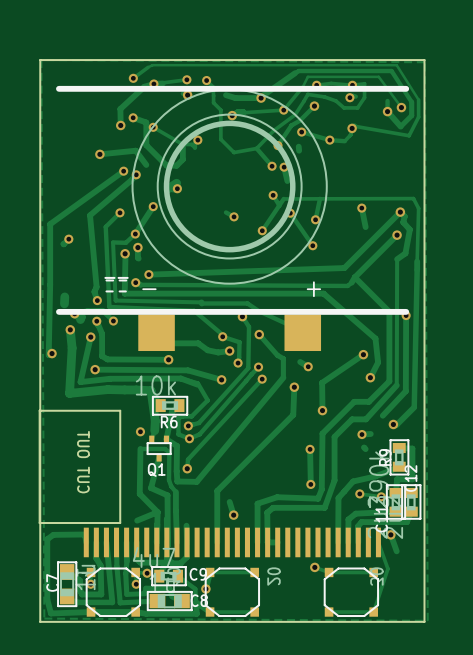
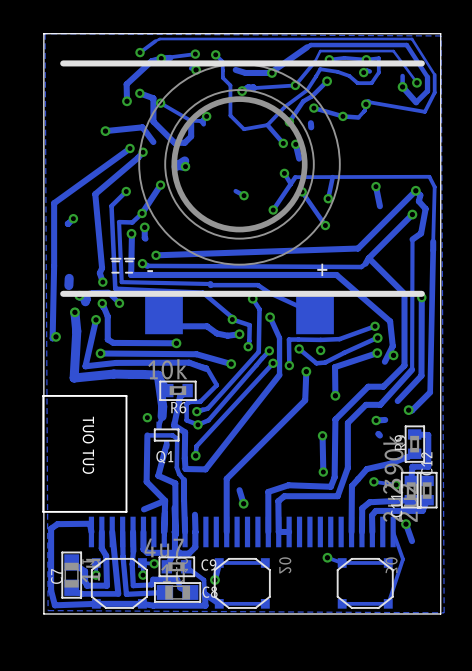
track: (259, 334) (277, 355) (283, 358) (283, 377) (196, 481) -> (270, 317) (279, 338) (279, 375) (205, 469)
track: none -> (375, 326) (339, 339) (288, 339) (289, 365)
via: none -> (375, 326)
track: none -> (376, 338) (325, 362) (316, 363) (299, 348)
track: (363, 354) (322, 382) -> (377, 353) (335, 367)
track: (300, 361) (308, 366) -> none
via: none -> (299, 348)
via: none -> (377, 353)
via: none -> (393, 355)
via: (370, 377) -> none
via: none -> (289, 365)

